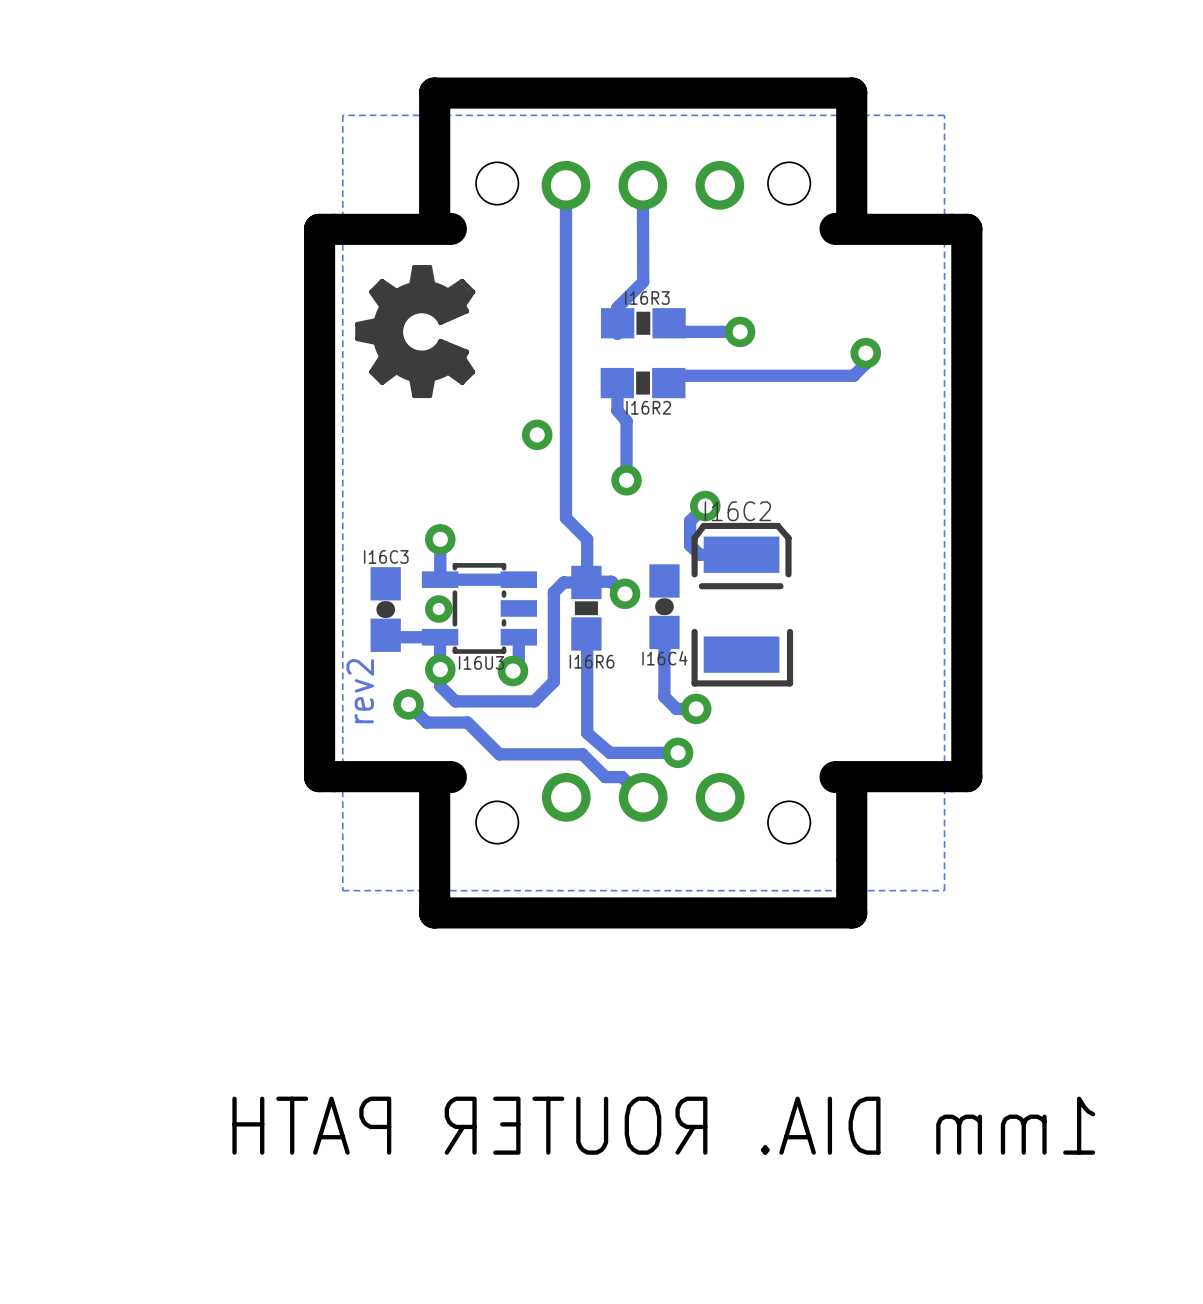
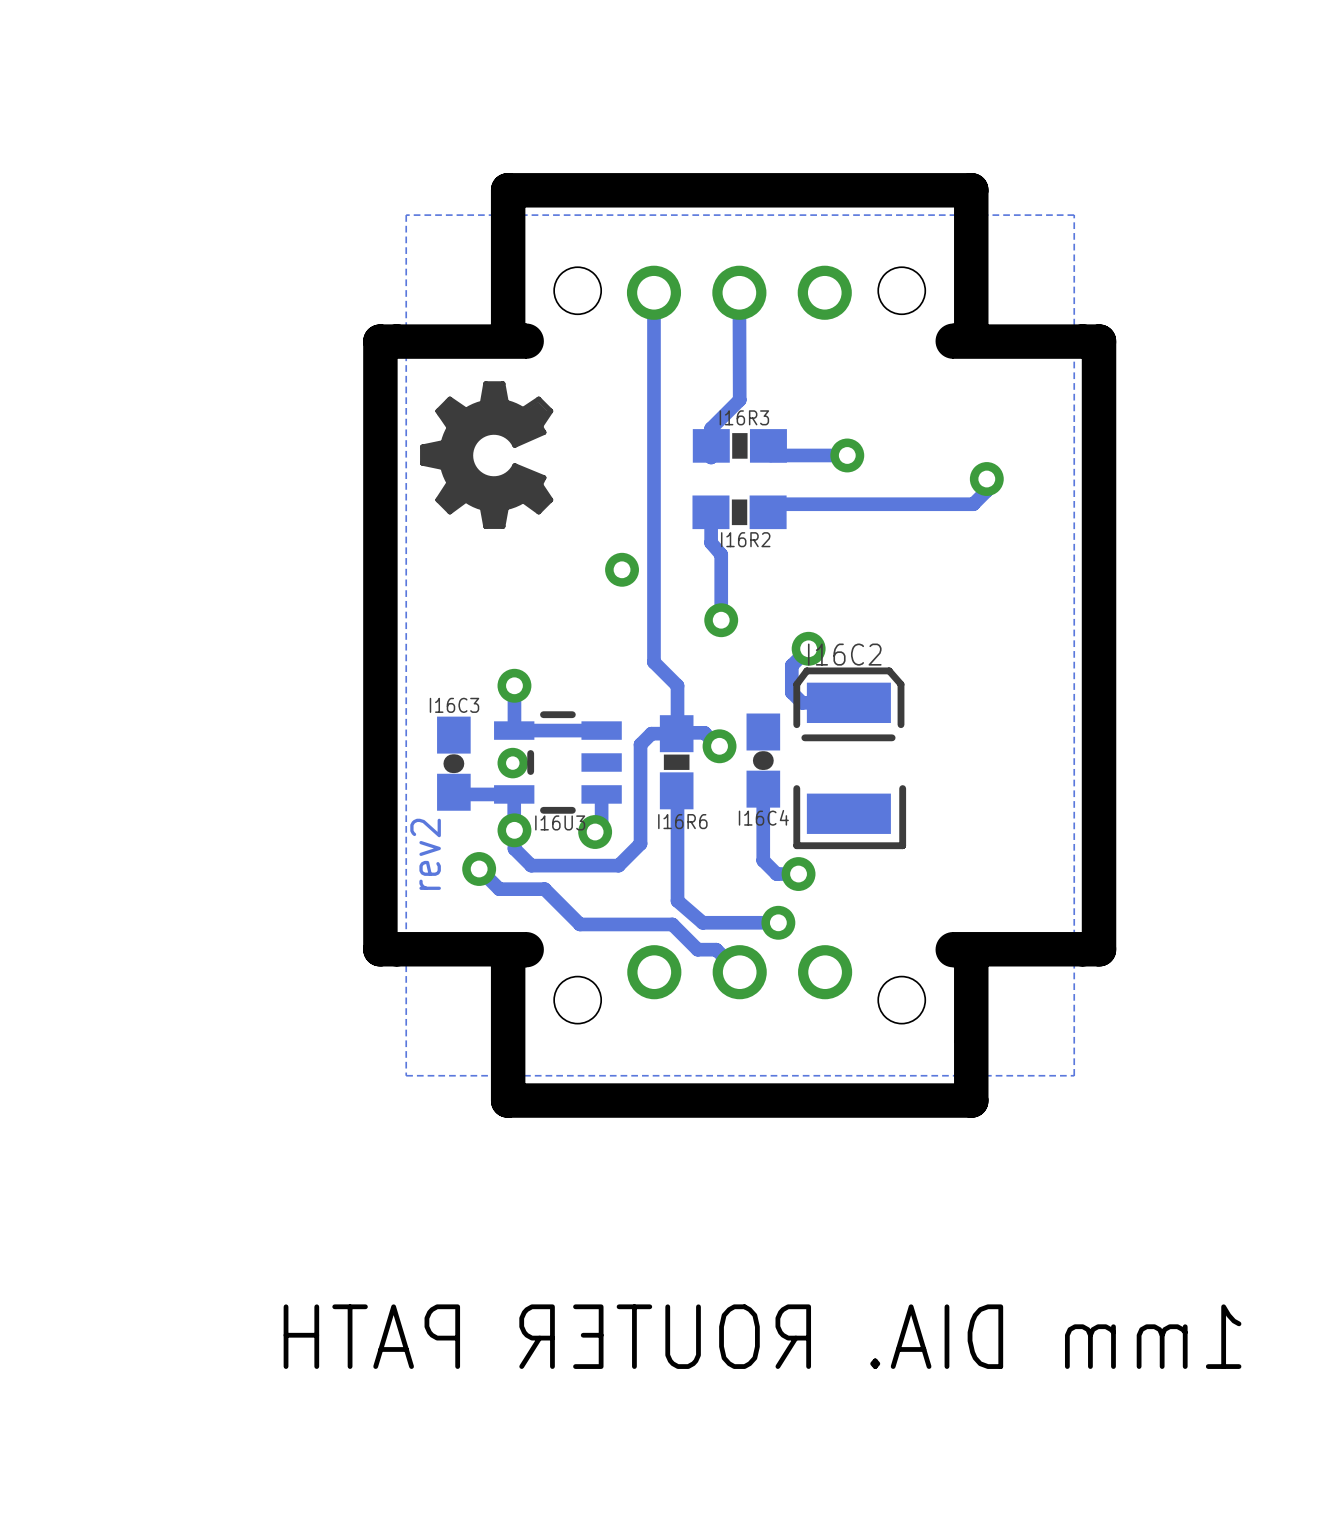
I16U3 footprint: [421, 563, 537, 654] -> [494, 711, 622, 814]

